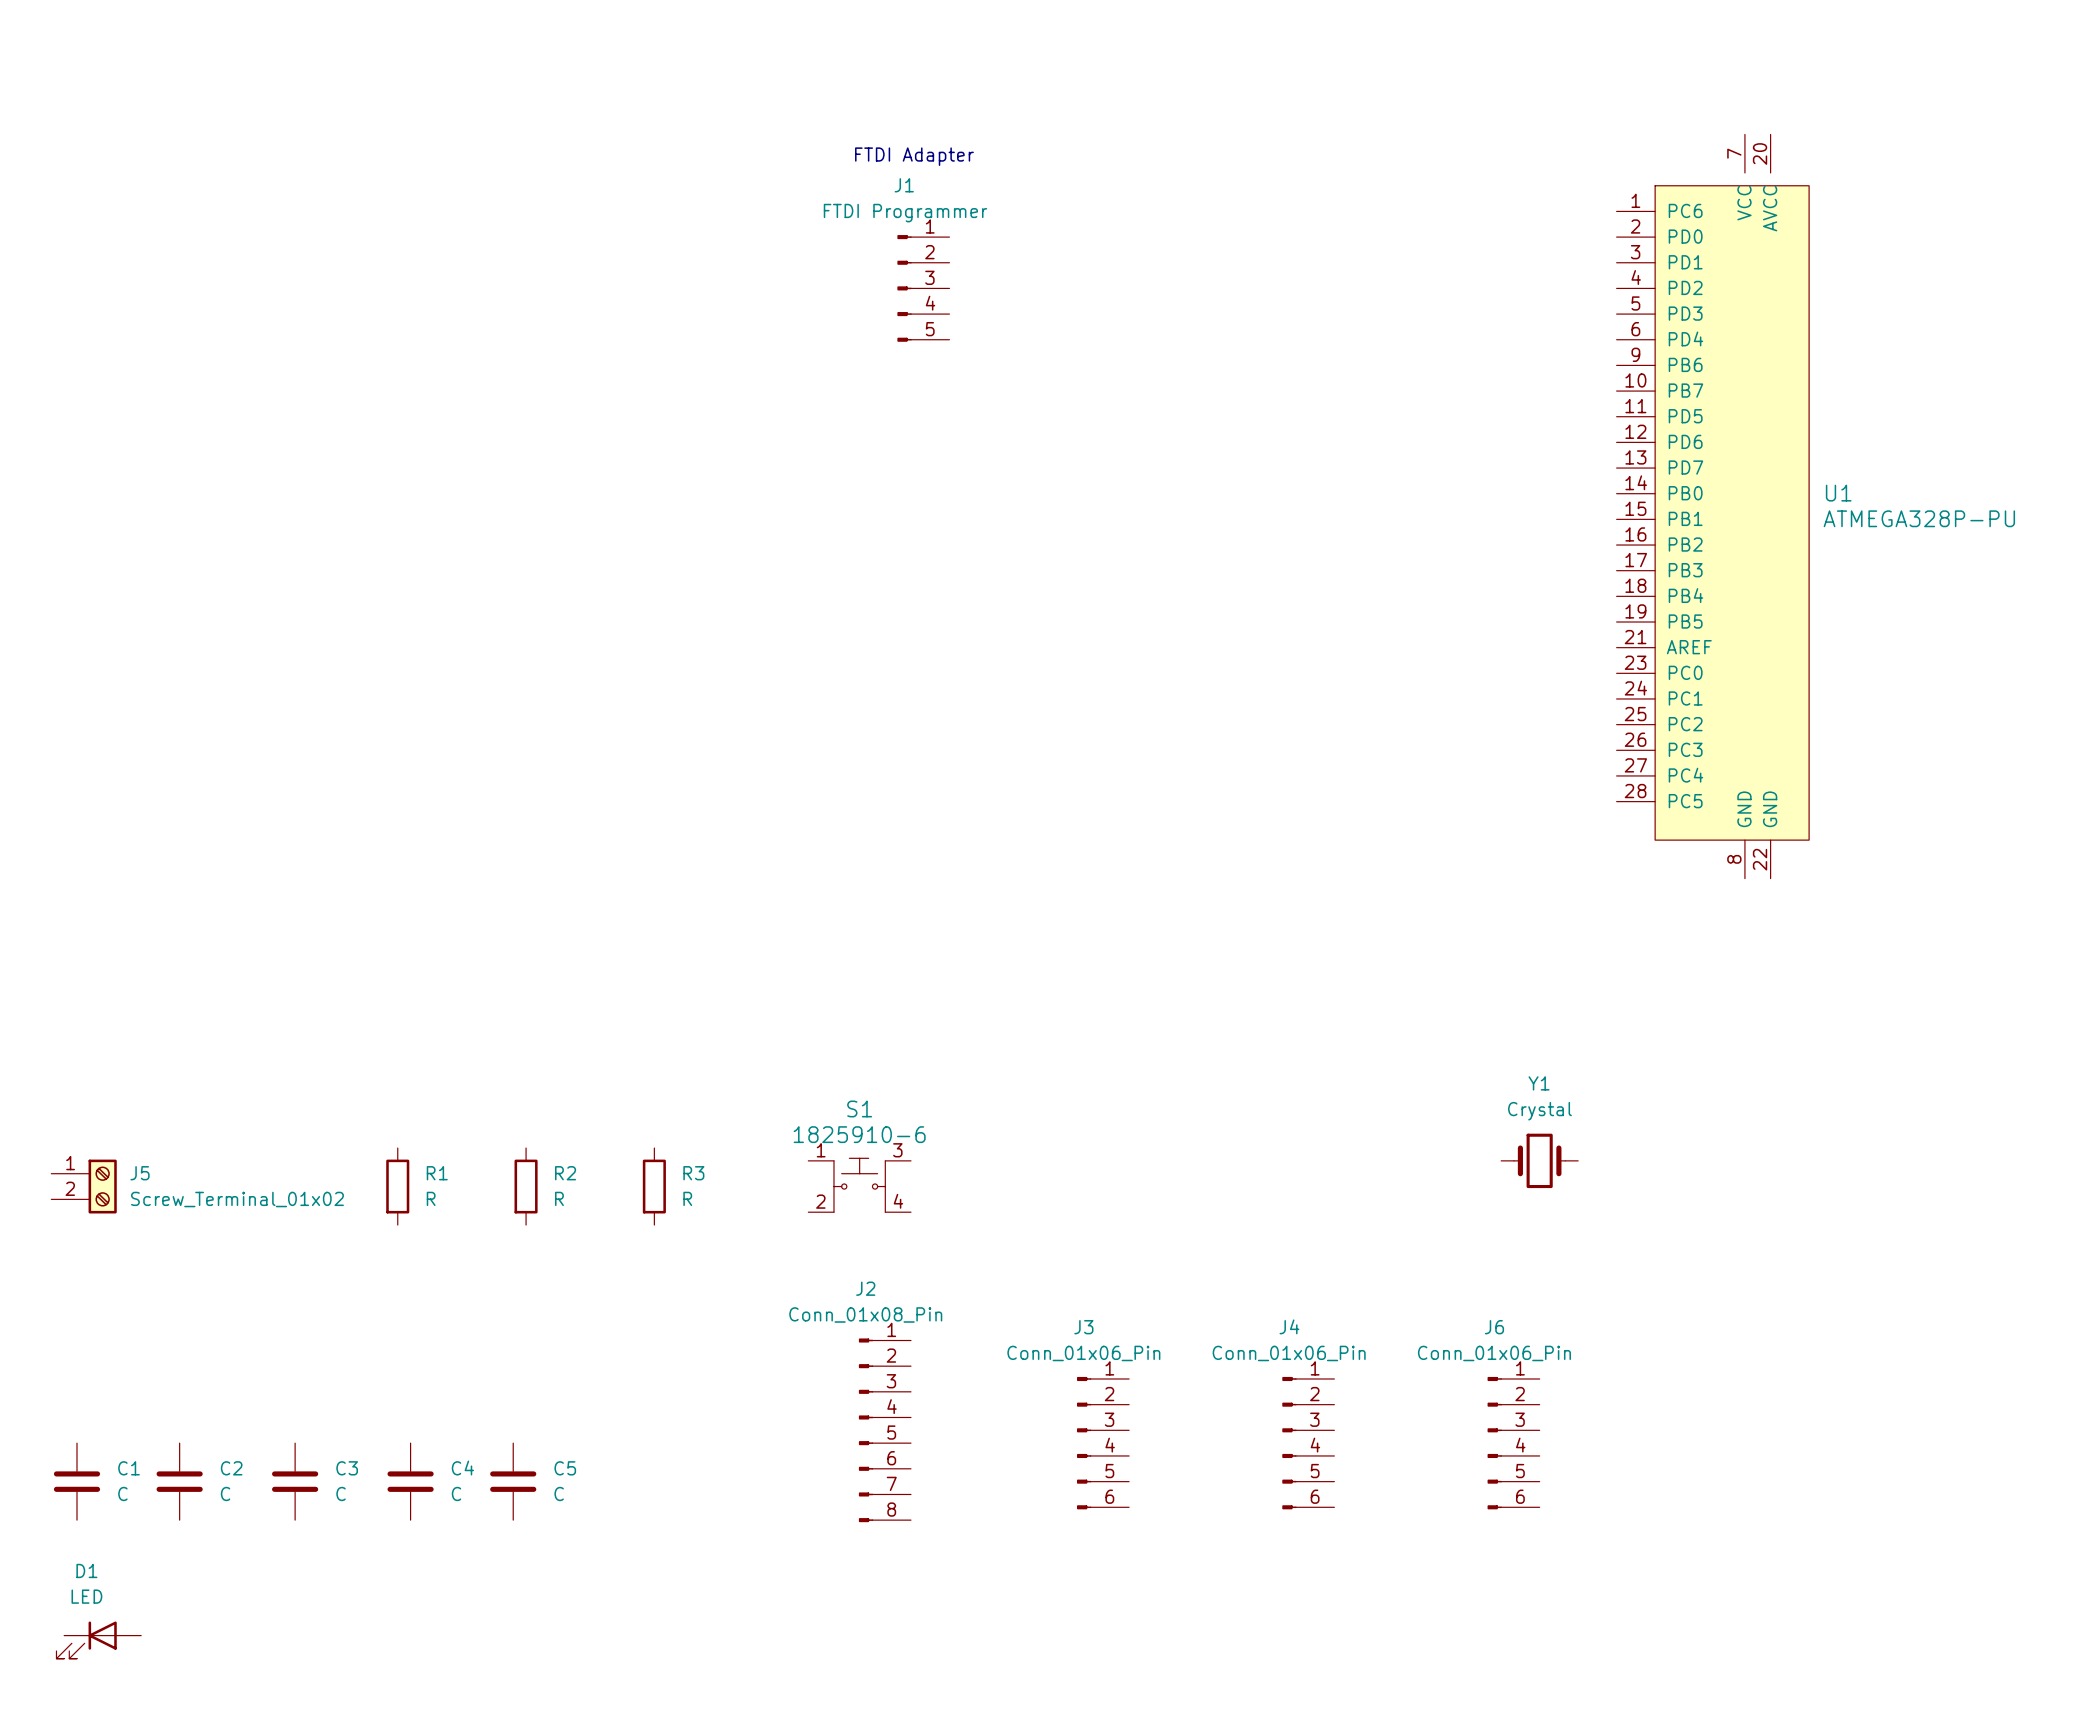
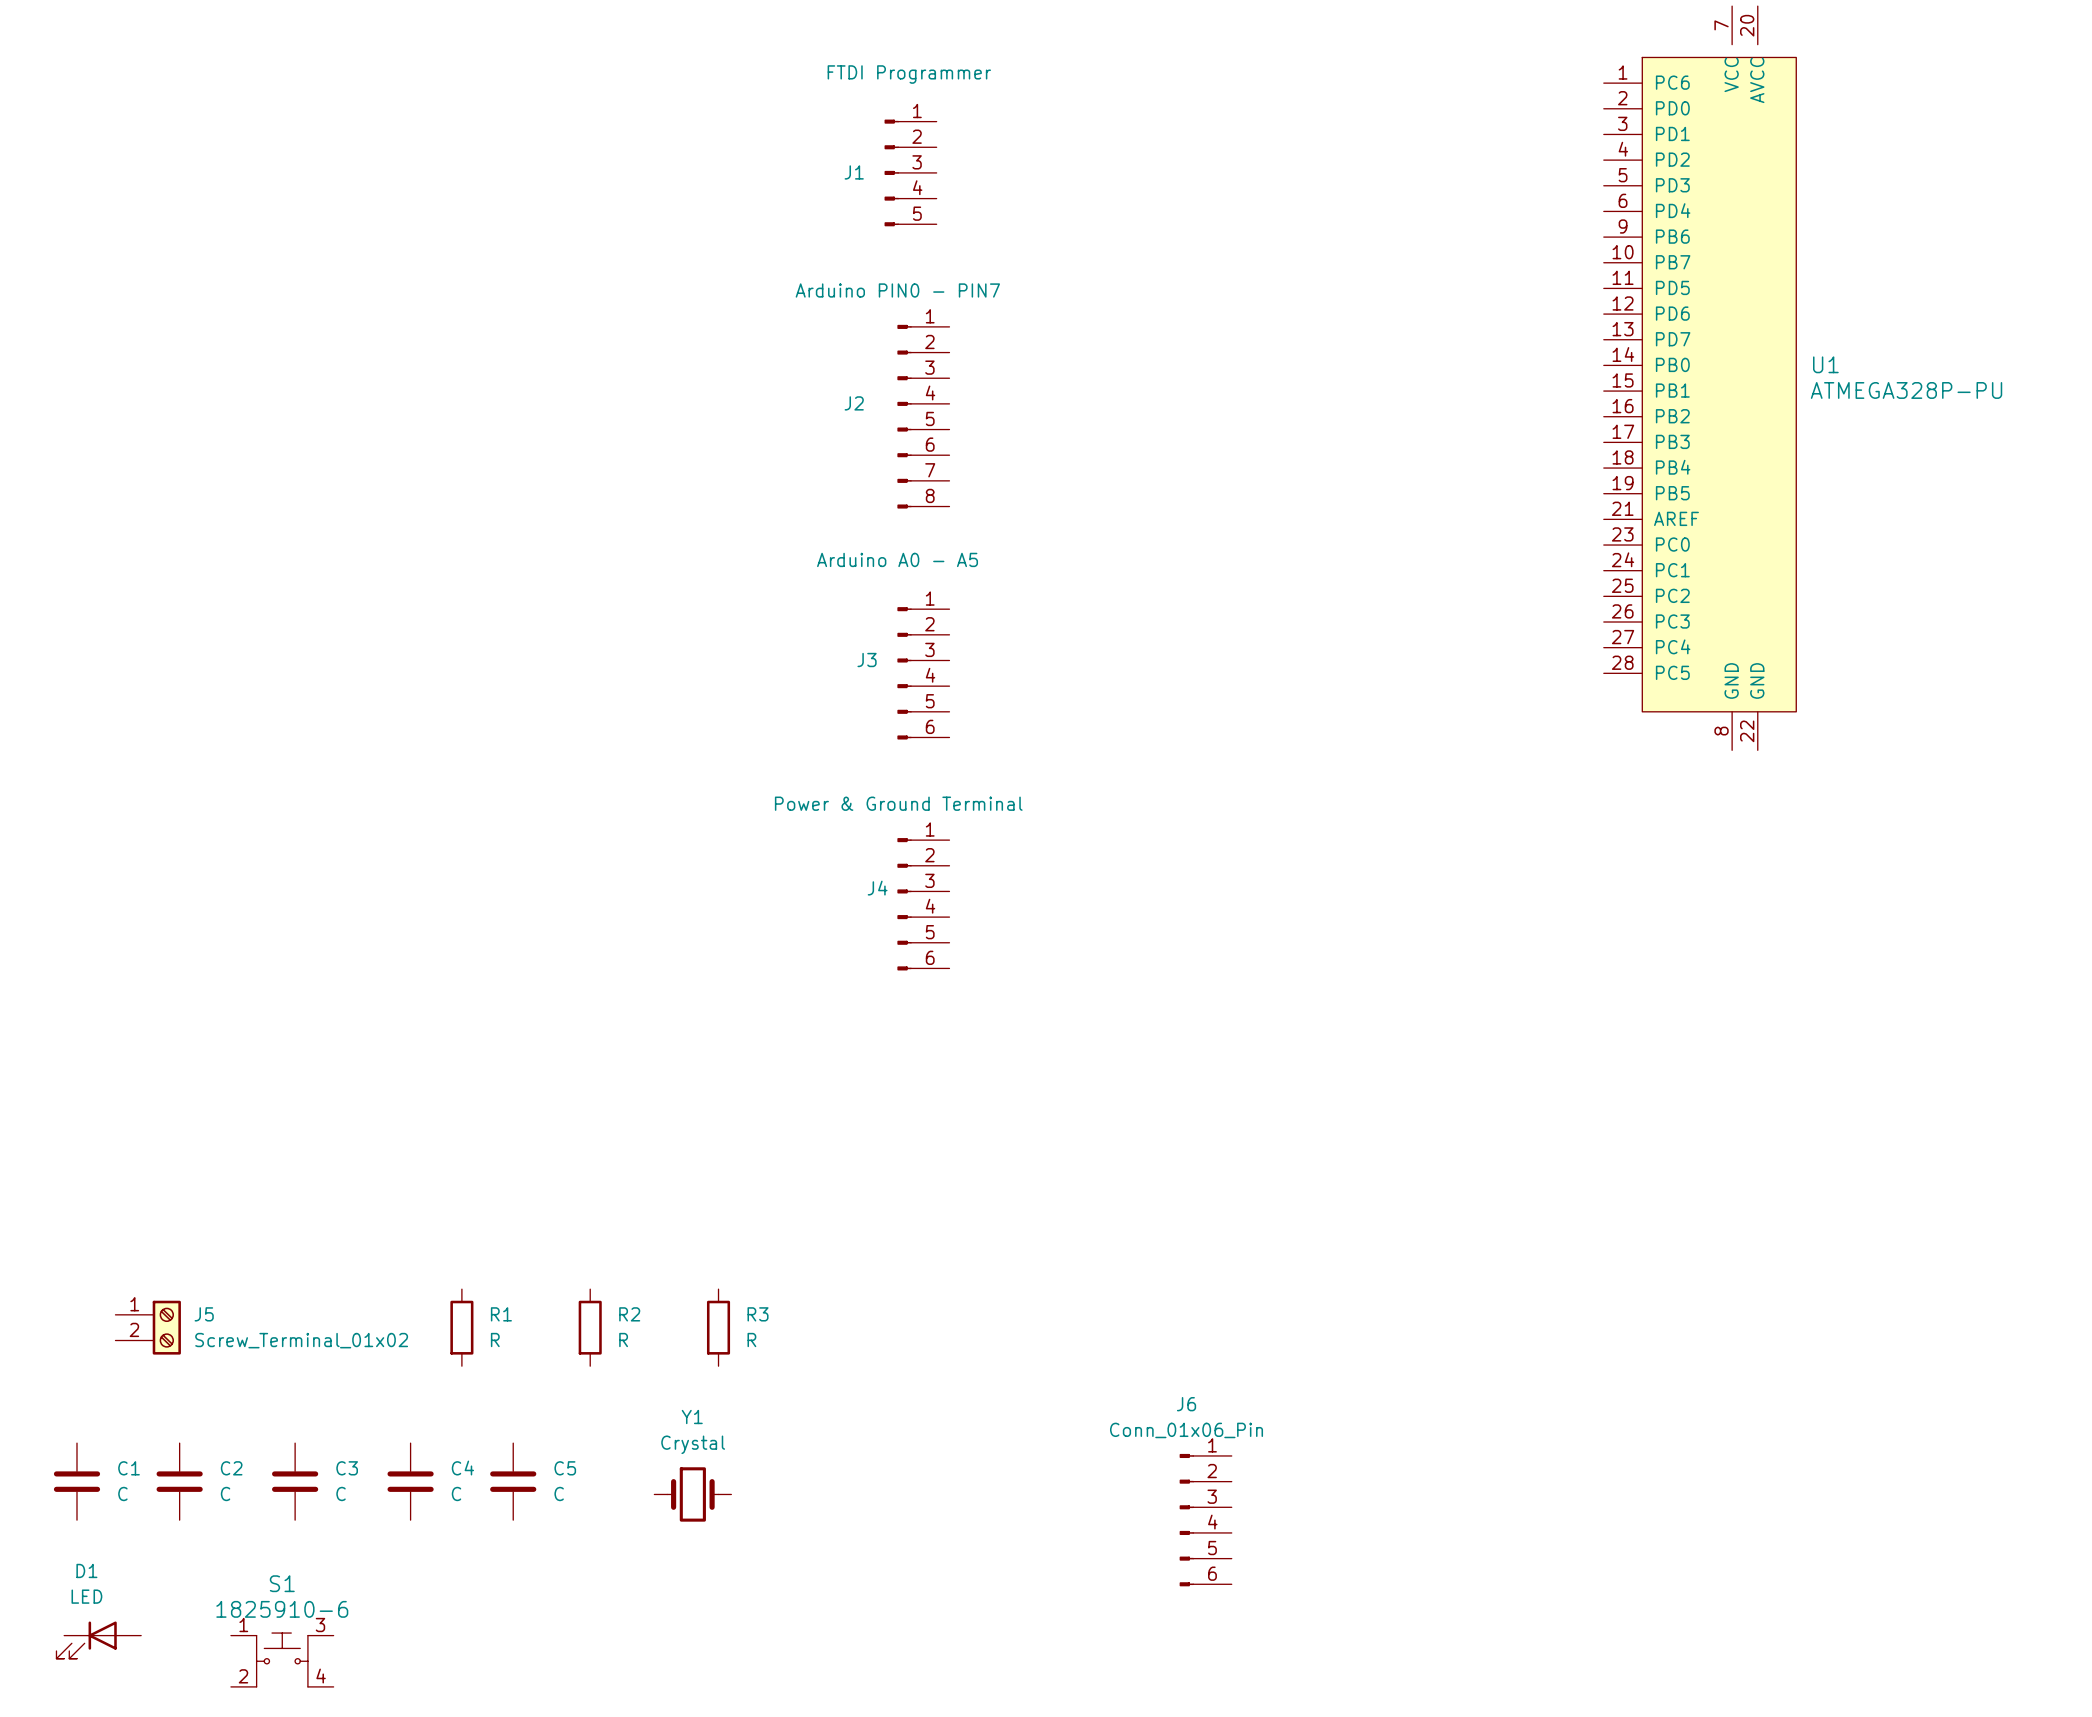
text: FTDI Adapter (914, 156) -> none
J1 name position: J1 (904, 185) -> J1 (854, 172)
J1 value position: FTDI Programmer (905, 213) -> FTDI Programmer (909, 74)
J1 position: (923, 288) -> (910, 172)
U1 position: (1712, 506) -> (1700, 378)
Y1 position: (1539, 1160) -> (692, 1494)
S1 position: (859, 1185) -> (282, 1659)
J5 position: (84, 1186) -> (148, 1327)
R1 position: (397, 1186) -> (461, 1327)
R2 position: (526, 1186) -> (590, 1327)
R3 position: (654, 1186) -> (718, 1327)
J2 name position: J2 (865, 1288) -> J2 (854, 403)
J2 value: Conn_01x08_Pin (865, 1314) -> Arduino PIN0 - PIN7 (897, 290)
J4 name position: J4 (1289, 1326) -> J4 (877, 888)
J3 name position: J3 (1083, 1327) -> J3 (867, 660)
J3 value: Conn_01x06_Pin (1083, 1353) -> Arduino A0 - A5 (897, 559)
J4 value: Conn_01x06_Pin (1289, 1353) -> Power & Ground Terminal (898, 803)
J2 position: (884, 1430) -> (923, 416)
J3 position: (1103, 1443) -> (923, 673)
J4 position: (1308, 1443) -> (923, 904)
J6 position: (1513, 1443) -> (1205, 1520)

